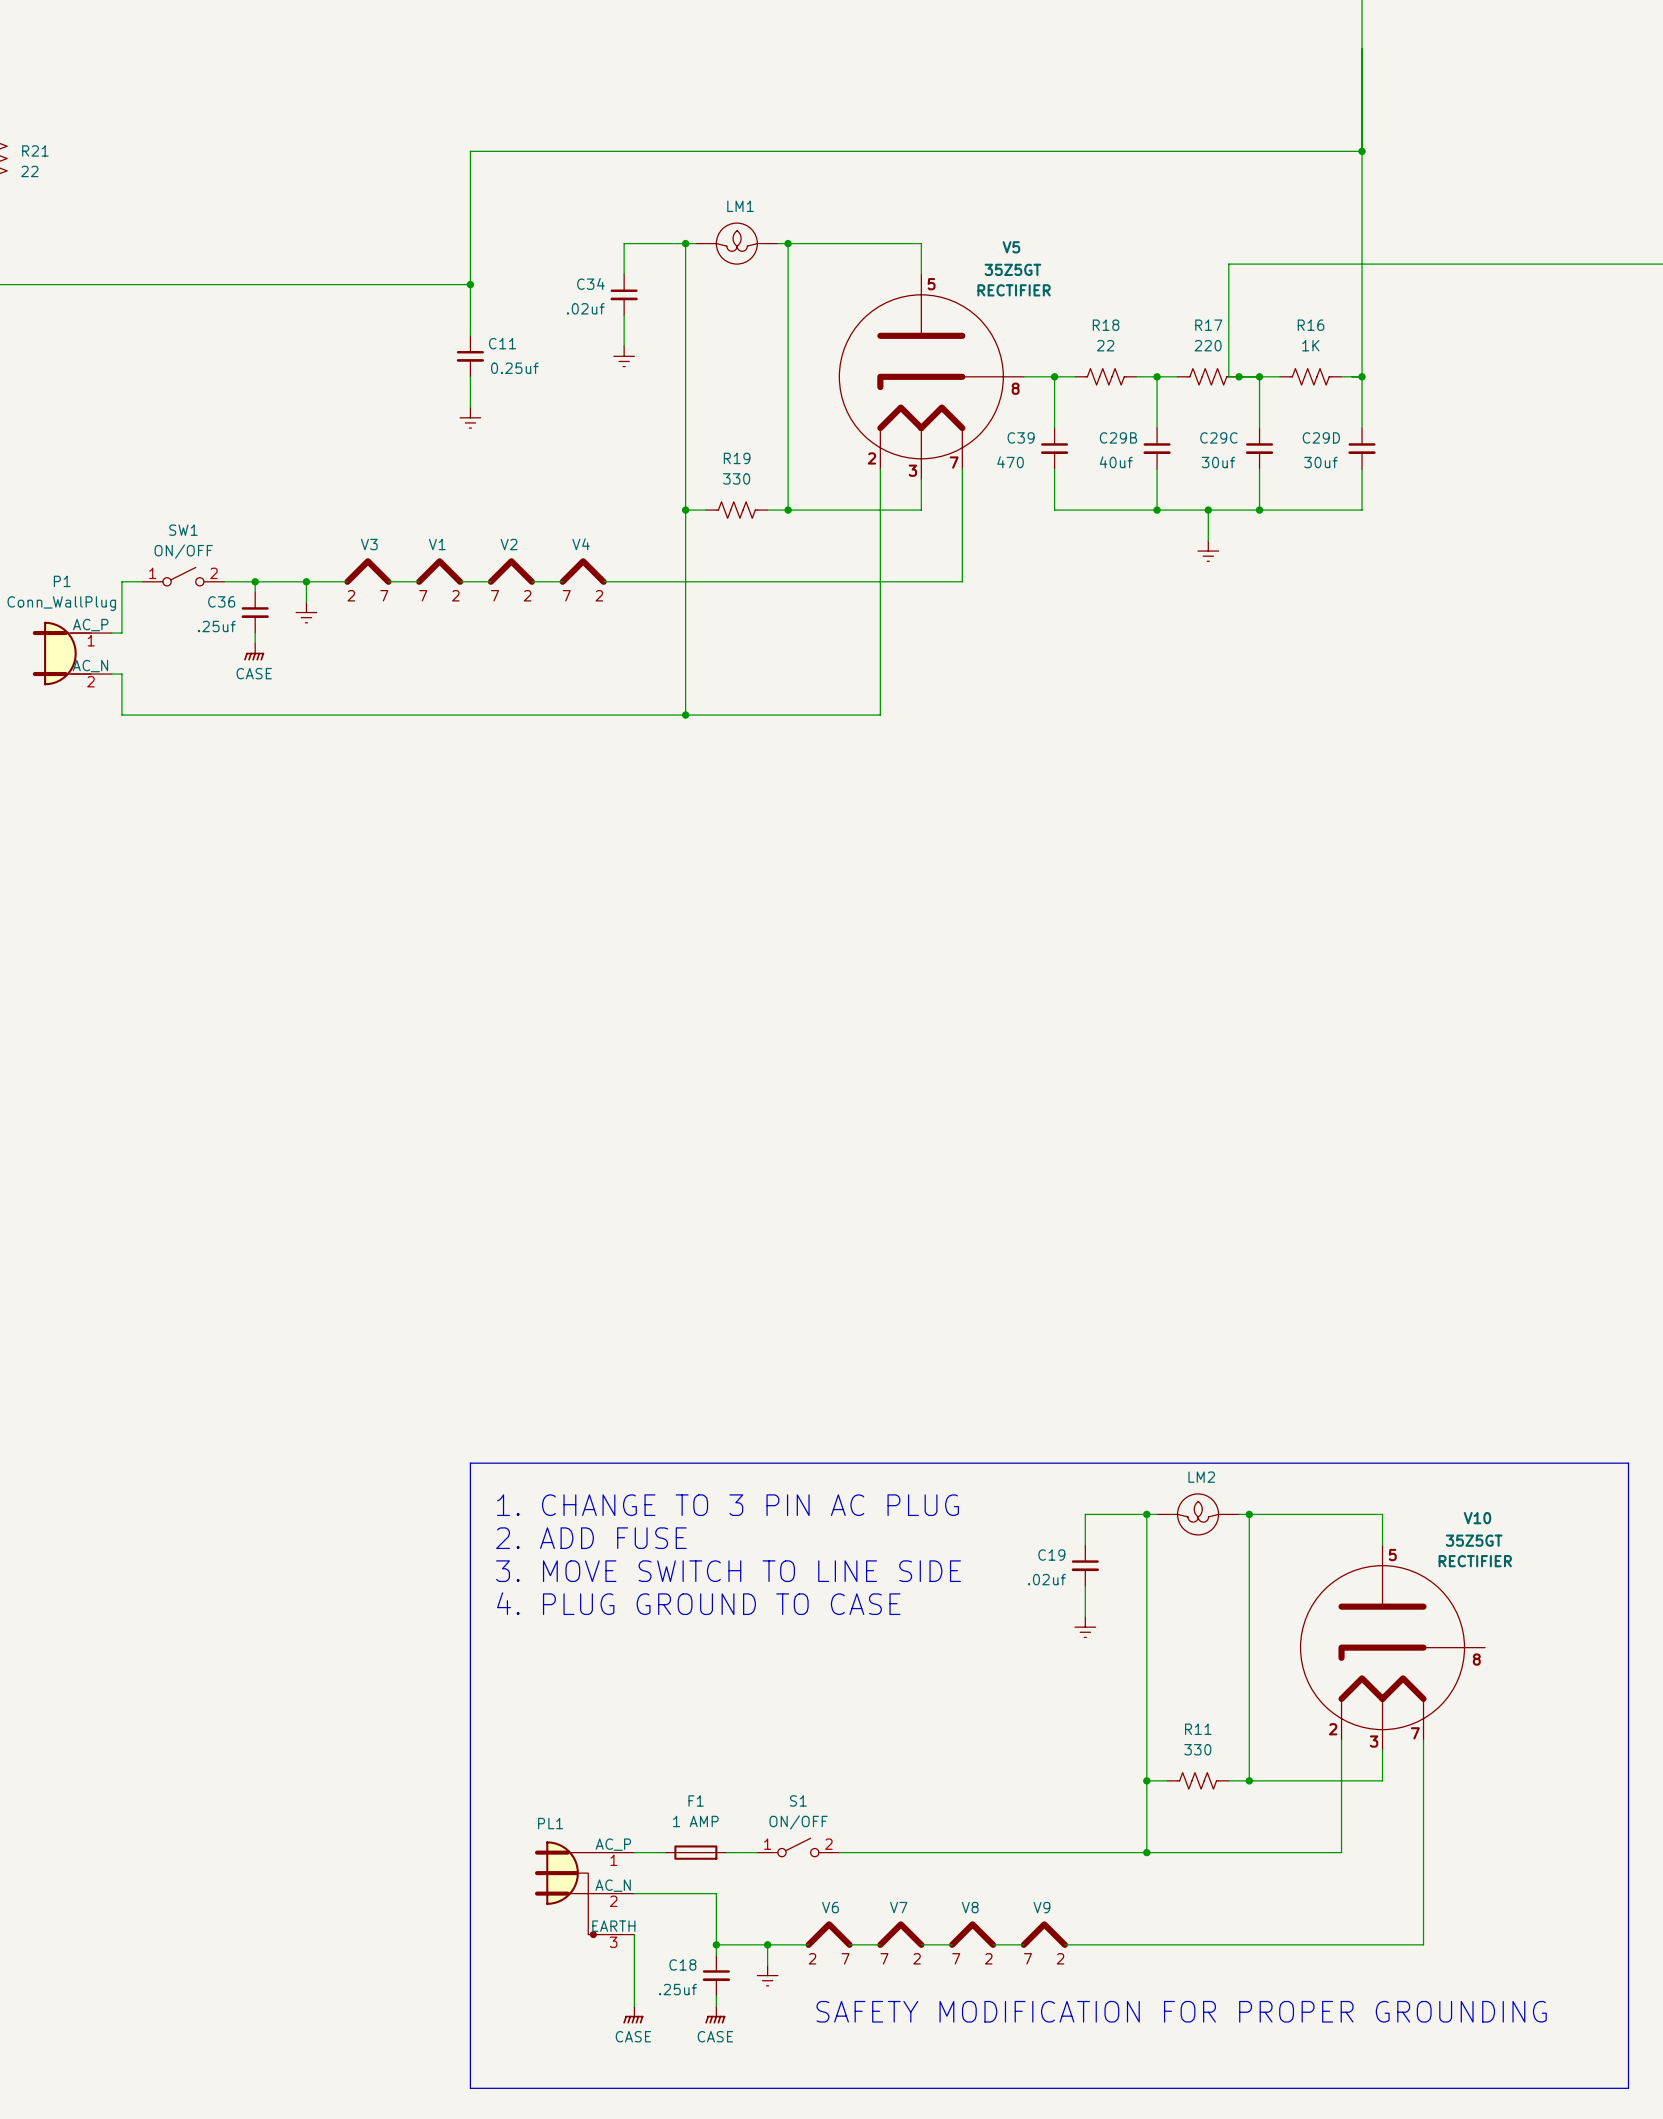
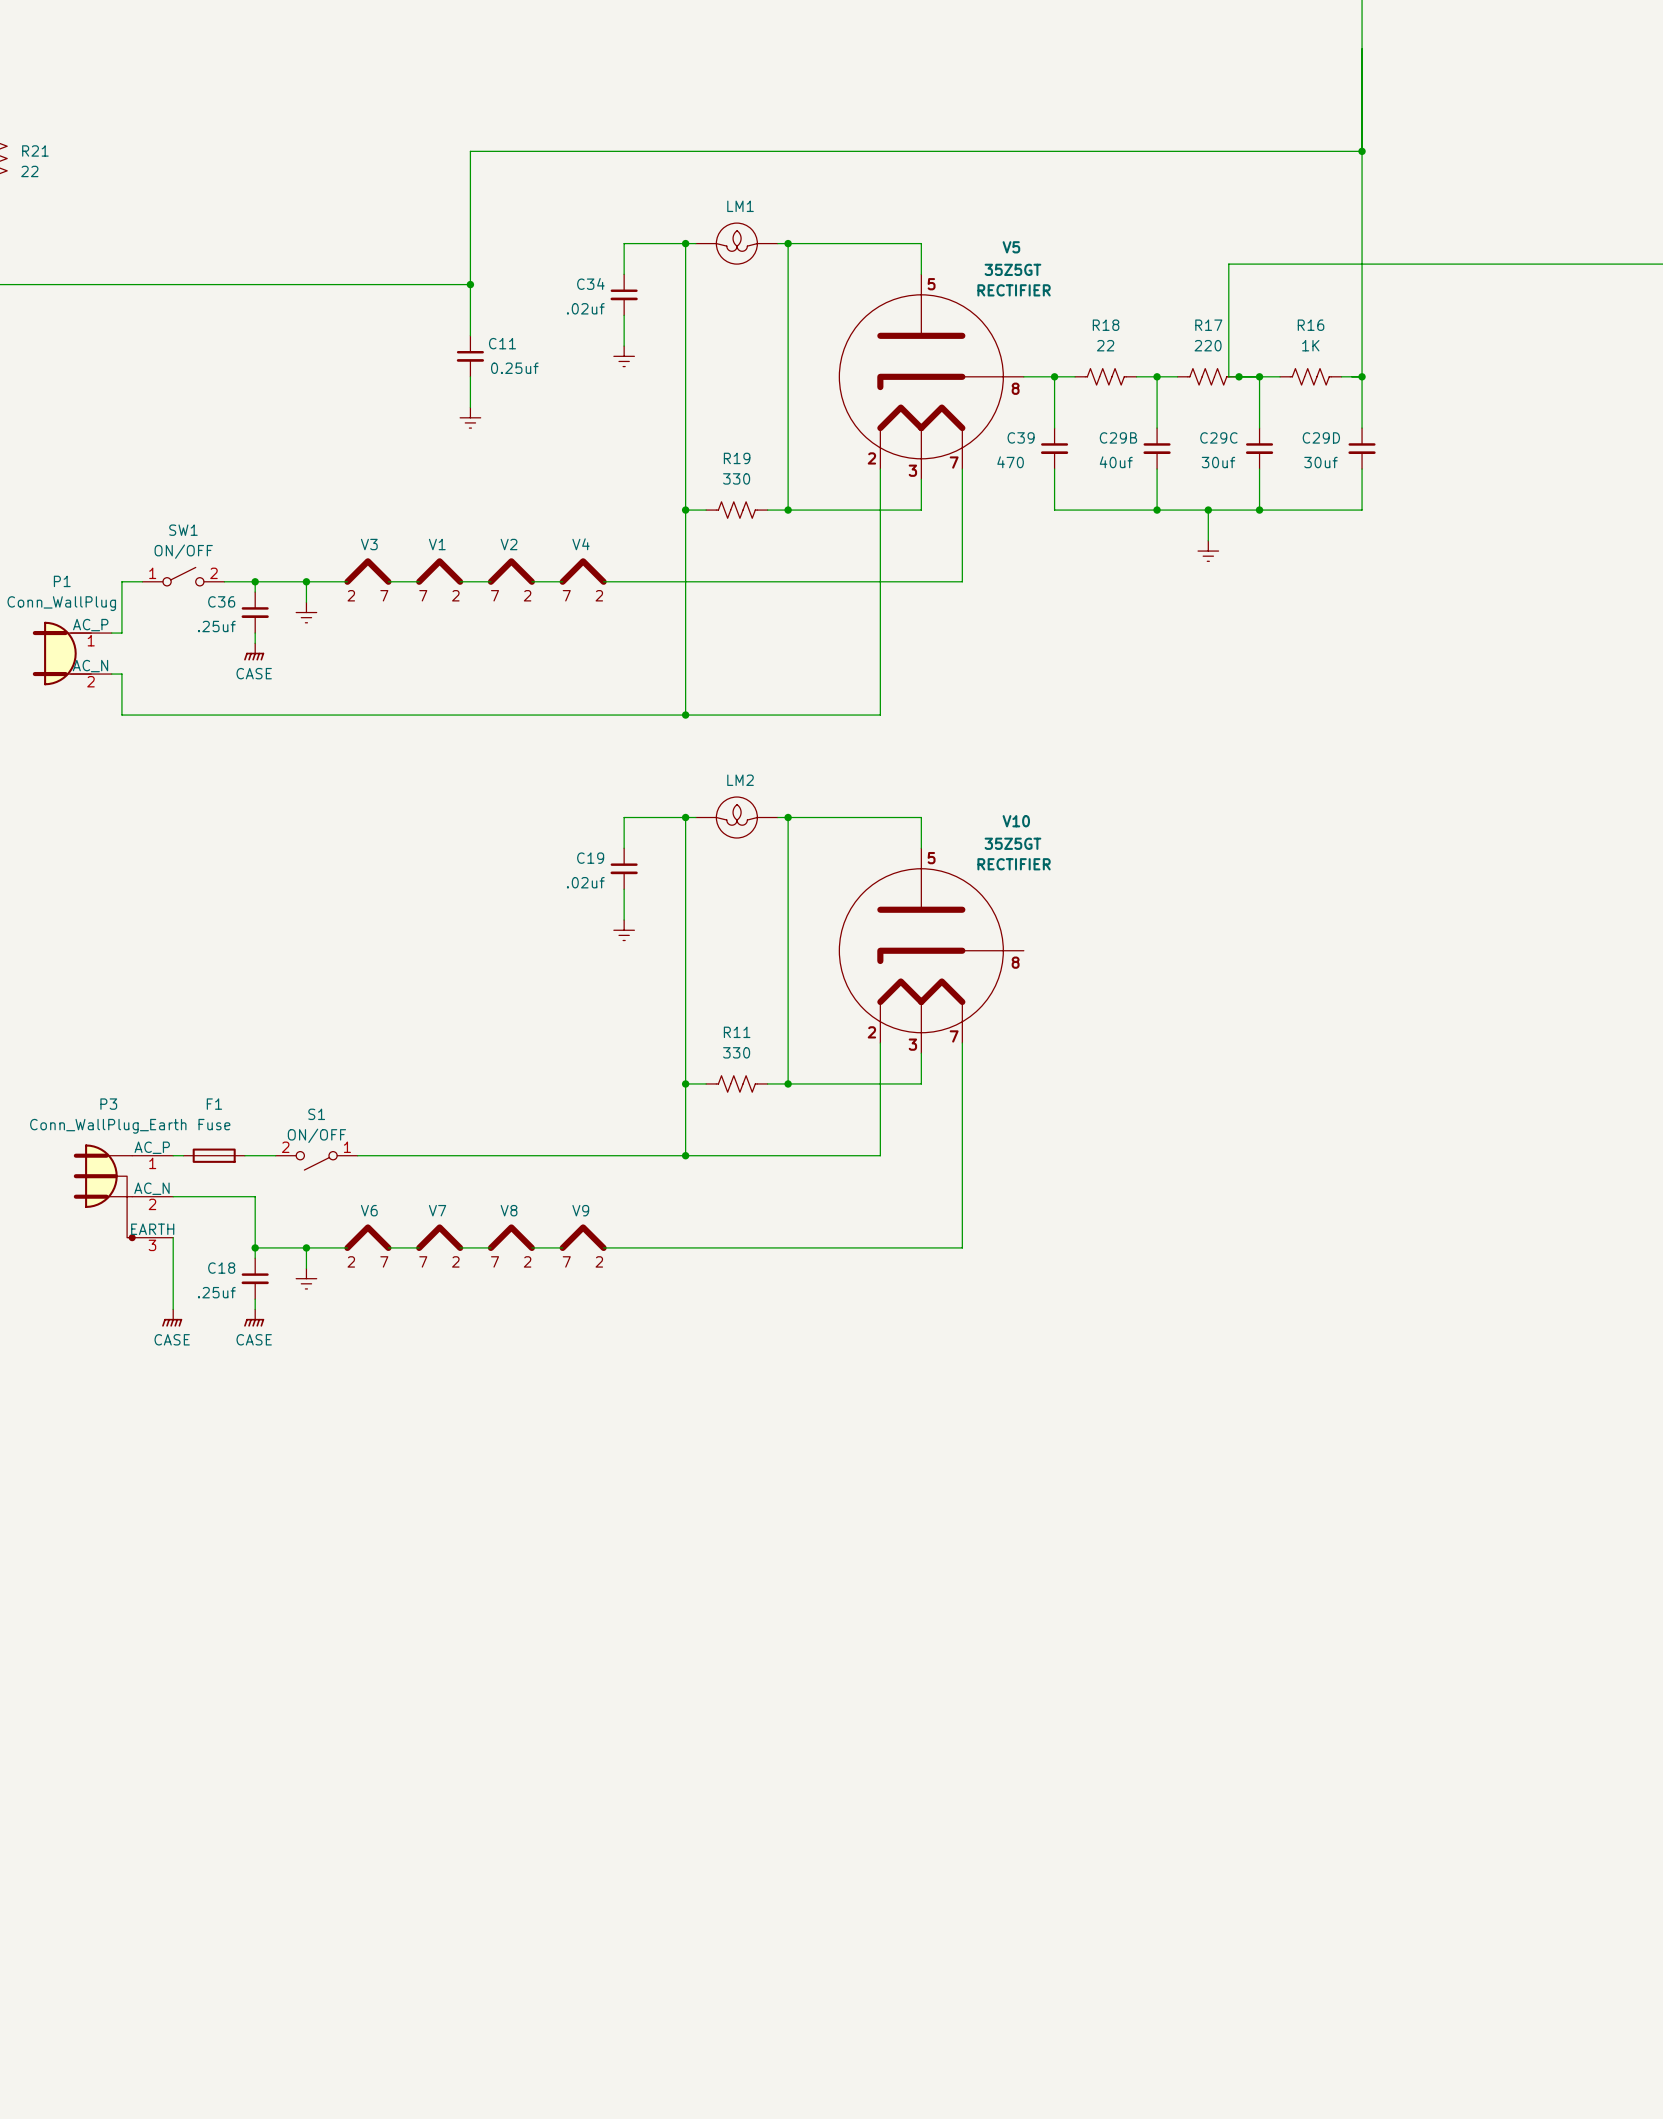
wire: none -> (685, 817) (685, 1155)
junction: none -> (685, 817)
wire: none -> (695, 817) (624, 817) (624, 848)
wire: none -> (777, 817) (921, 817) (921, 848)
wire: none -> (788, 817) (788, 1083)
junction: none -> (788, 817)
wire: none -> (624, 889) (624, 919)
power symbol: none -> (624, 930)
wire: none -> (880, 1042) (880, 1155) (357, 1155)
wire: none -> (962, 1042) (962, 1247) (603, 1247)
wire: none -> (921, 1053) (921, 1083) (767, 1083)
wire: none -> (685, 1083) (706, 1083)
junction: none -> (685, 1083)
junction: none -> (788, 1083)
wire: none -> (173, 1155) (183, 1155)
wire: none -> (244, 1155) (275, 1155)
junction: none -> (685, 1155)
P3: none -> Conn_WallPlug_Earth (123, 1192)
wire: none -> (173, 1196) (255, 1196) (255, 1258)
wire: none -> (173, 1237) (173, 1309)
wire: none -> (255, 1247) (347, 1247)
junction: none -> (255, 1247)
wire: none -> (306, 1247) (306, 1268)
junction: none -> (306, 1247)
wire: none -> (388, 1247) (419, 1247)
wire: none -> (460, 1247) (490, 1247)
wire: none -> (531, 1247) (562, 1247)
power symbol: none -> (306, 1278)
wire: none -> (255, 1299) (255, 1309)
power symbol: none -> CASE (172, 1318)
power symbol: none -> CASE (254, 1318)
line: (470, 1463) (1628, 1463) (1628, 2088) (470, 2088) (470, 1463) -> none
text: 1. CHANGE TO 3 PIN AC PLUG (728, 1505) -> none
wire: (1146, 1514) (1146, 1852) -> none
junction: (1146, 1514) -> none
wire: (1157, 1514) (1085, 1514) (1085, 1545) -> none
LM2 position: (1198, 1514) -> (736, 817)
wire: (1239, 1514) (1382, 1514) (1382, 1545) -> none
wire: (1249, 1514) (1249, 1780) -> none
junction: (1249, 1514) -> none
text: 2. ADD FUSE (591, 1538) -> none
C19 position: (1085, 1565) -> (624, 868)
text: 3. MOVE SWITCH TO LINE SIDE (728, 1571) -> none
wire: (1085, 1586) (1085, 1616) -> none
text: 4. PLUG GROUND TO CASE (698, 1603) -> none
power symbol: (1085, 1627) -> none
V10 position: (1392, 1647) -> (931, 950)
wire: (1341, 1739) (1341, 1852) (839, 1852) -> none
wire: (1423, 1739) (1423, 1944) (1064, 1944) -> none
wire: (1382, 1750) (1382, 1780) (1228, 1780) -> none
wire: (1146, 1780) (1167, 1780) -> none
junction: (1146, 1780) -> none
R11 position: (1198, 1780) -> (736, 1083)
junction: (1249, 1780) -> none
F1 value: 1 AMP (695, 1821) -> Fuse (214, 1124)
S1 rotation: 0° (798, 1847) -> 180° (316, 1160)
S1 position: (798, 1847) -> (316, 1160)
wire: (634, 1852) (665, 1852) -> none
F1 position: (695, 1852) -> (214, 1155)
wire: (726, 1852) (757, 1852) -> none
junction: (1146, 1852) -> none
PL1: (584, 1889) -> none
wire: (634, 1893) (716, 1893) (716, 1955) -> none
wire: (634, 1934) (634, 2006) -> none
V6 position: (829, 1934) -> (367, 1237)
V7 position: (900, 1934) -> (439, 1237)
V8 position: (972, 1934) -> (511, 1237)
V9 position: (1044, 1934) -> (583, 1237)
wire: (716, 1944) (808, 1944) -> none
junction: (716, 1944) -> none
wire: (767, 1944) (767, 1965) -> none
junction: (767, 1944) -> none
wire: (849, 1944) (880, 1944) -> none
wire: (921, 1944) (952, 1944) -> none
wire: (993, 1944) (1023, 1944) -> none
C18 position: (716, 1975) -> (255, 1278)
power symbol: (767, 1975) -> none
wire: (716, 1996) (716, 2006) -> none
text: SAFETY MODIFICATION FOR PROPER GROUNDING (1181, 2011) -> none
power symbol: CASE (633, 2014) -> none
power symbol: CASE (715, 2014) -> none

